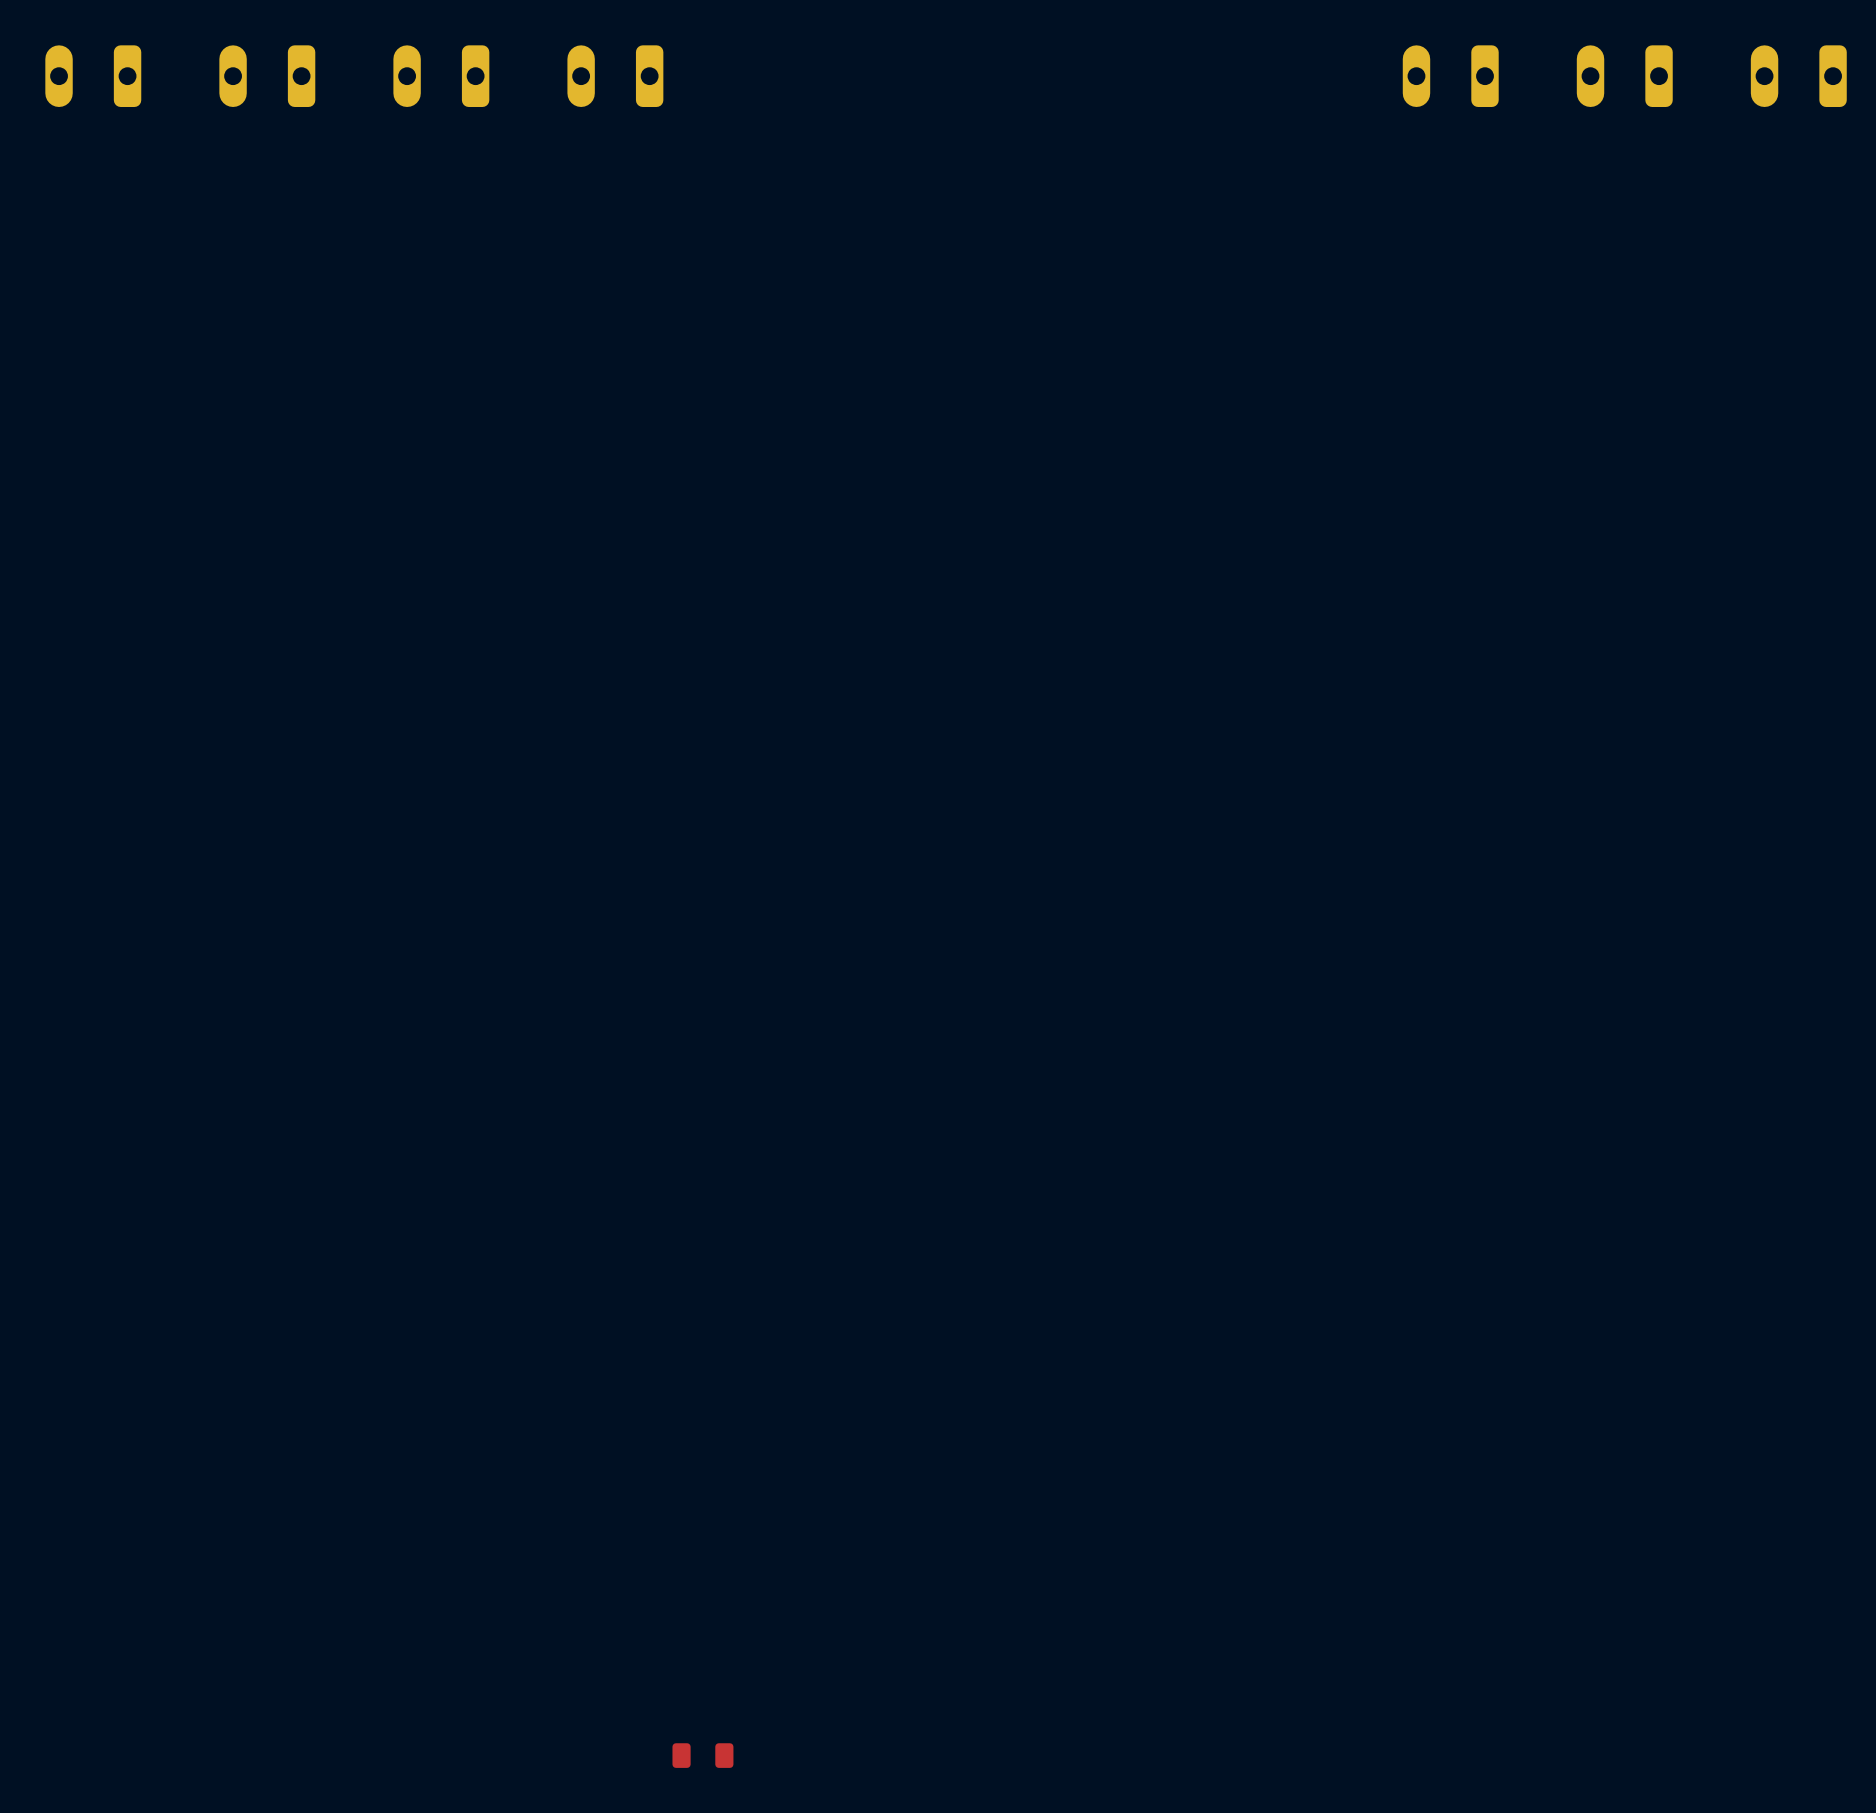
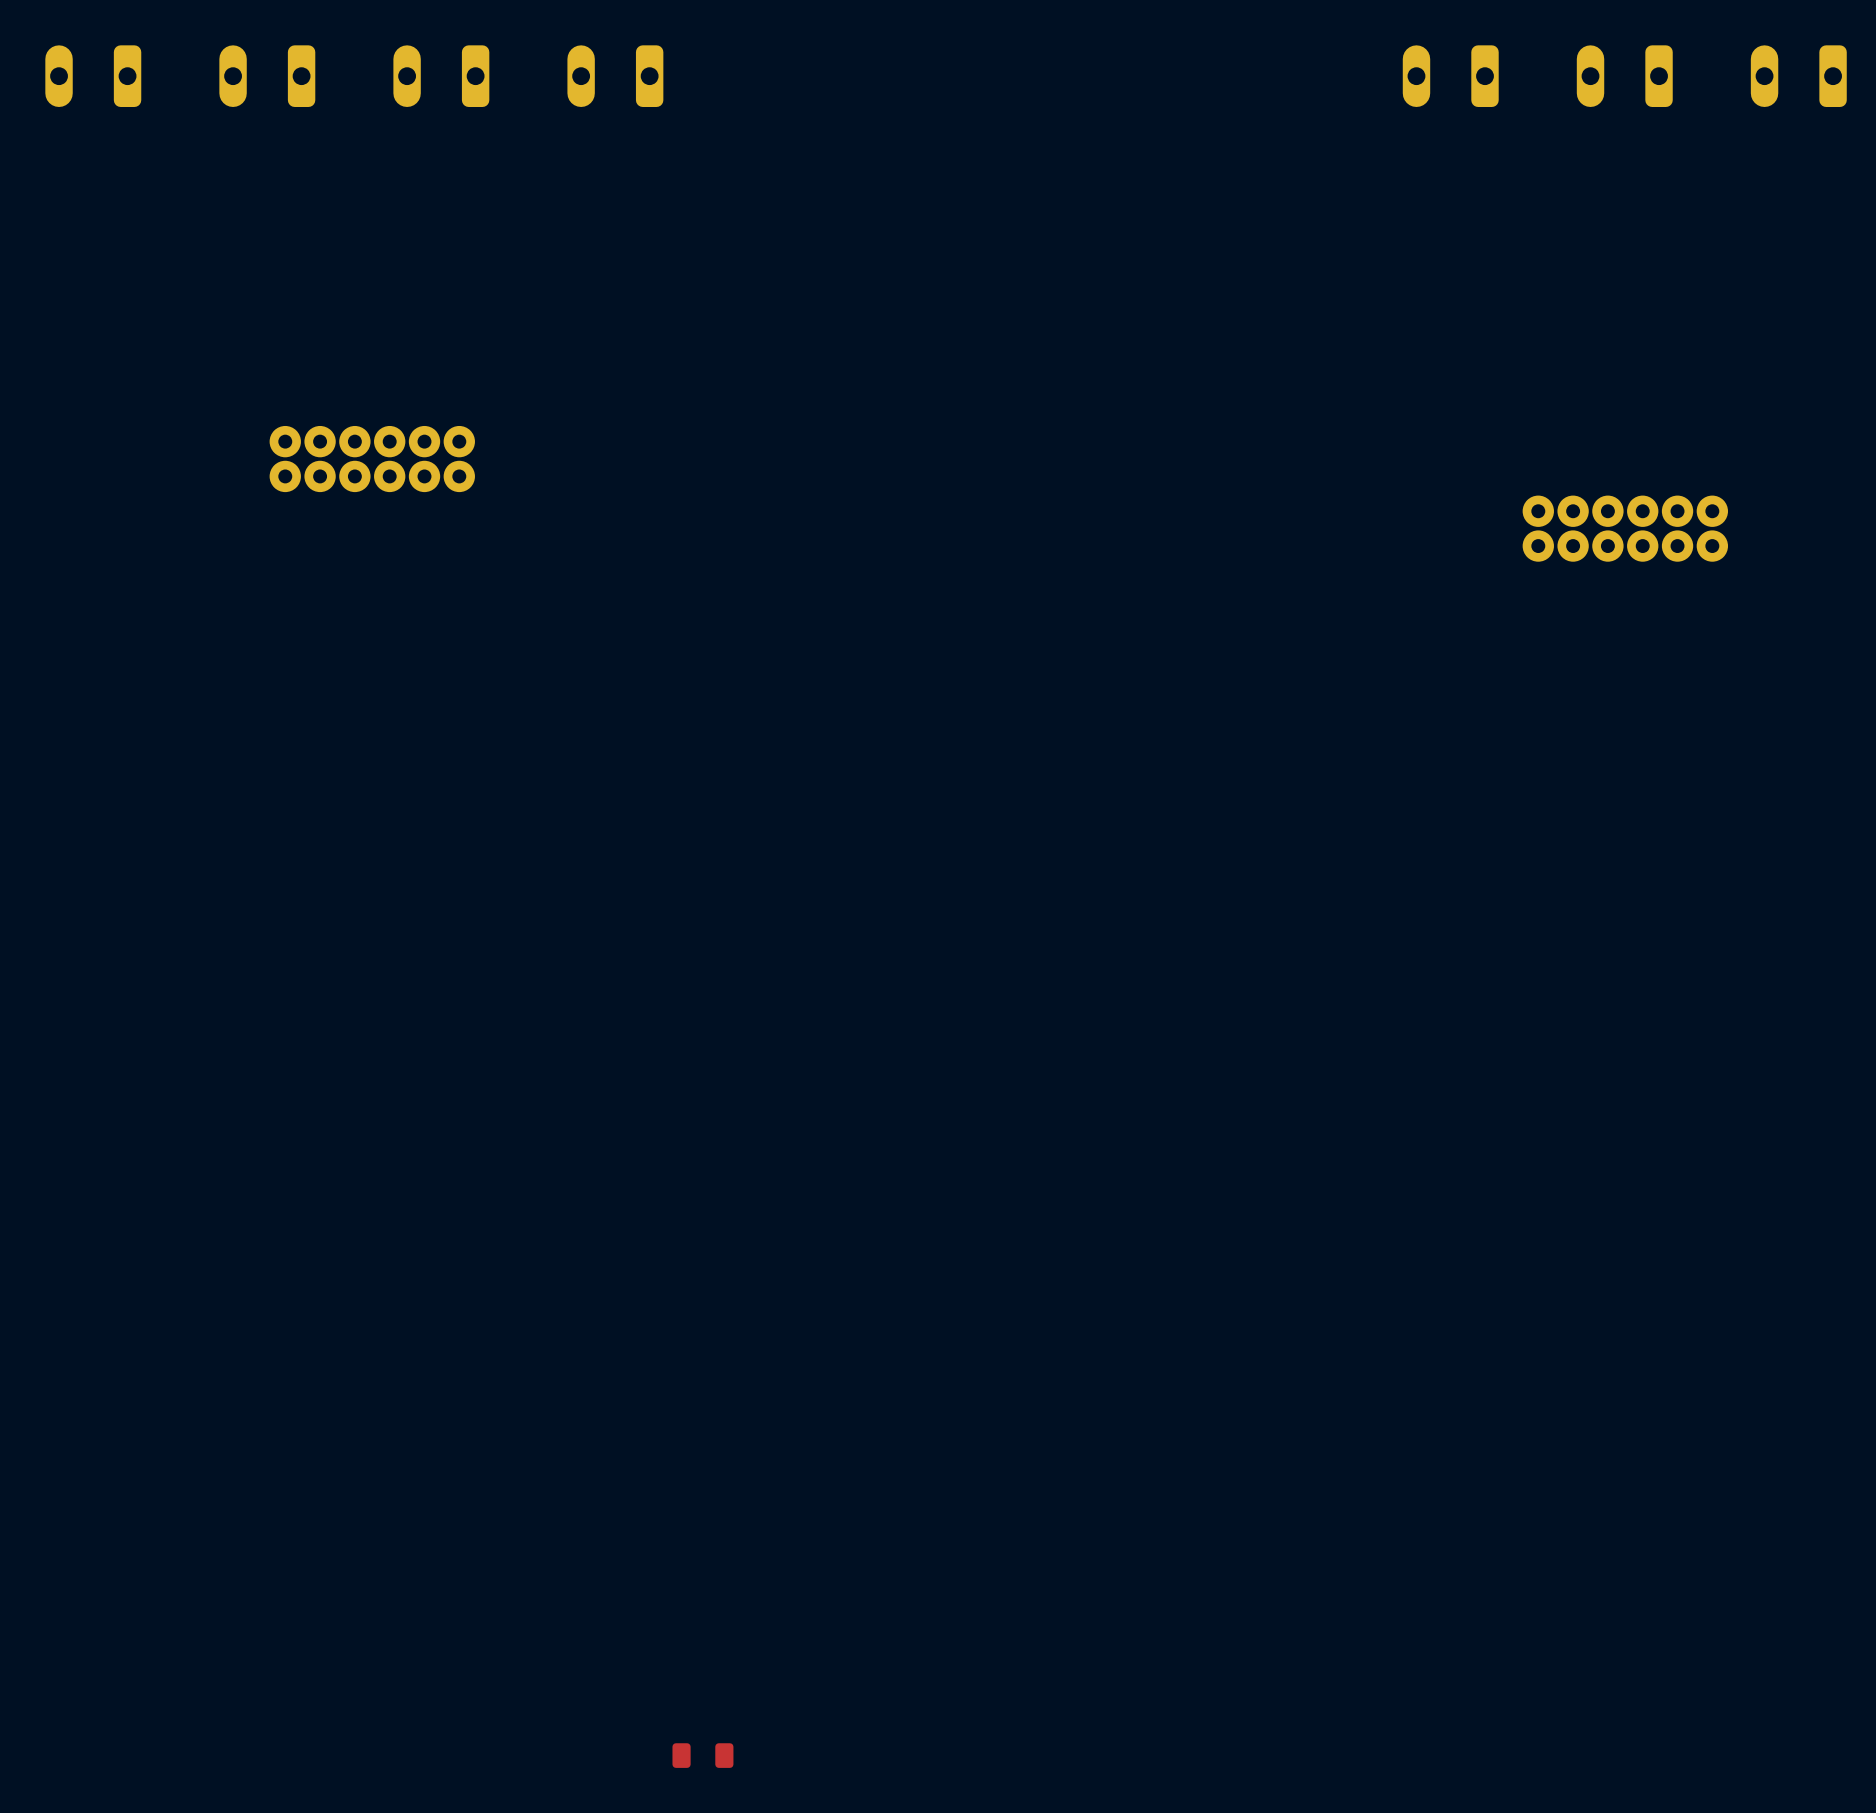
part: none -> (372, 459)
part: none -> (1625, 528)

